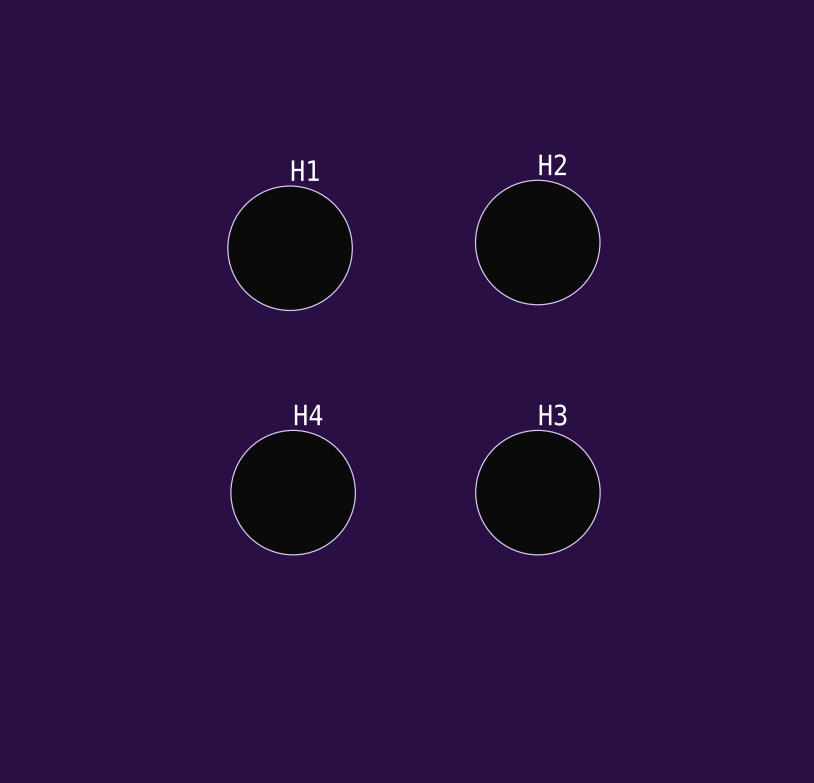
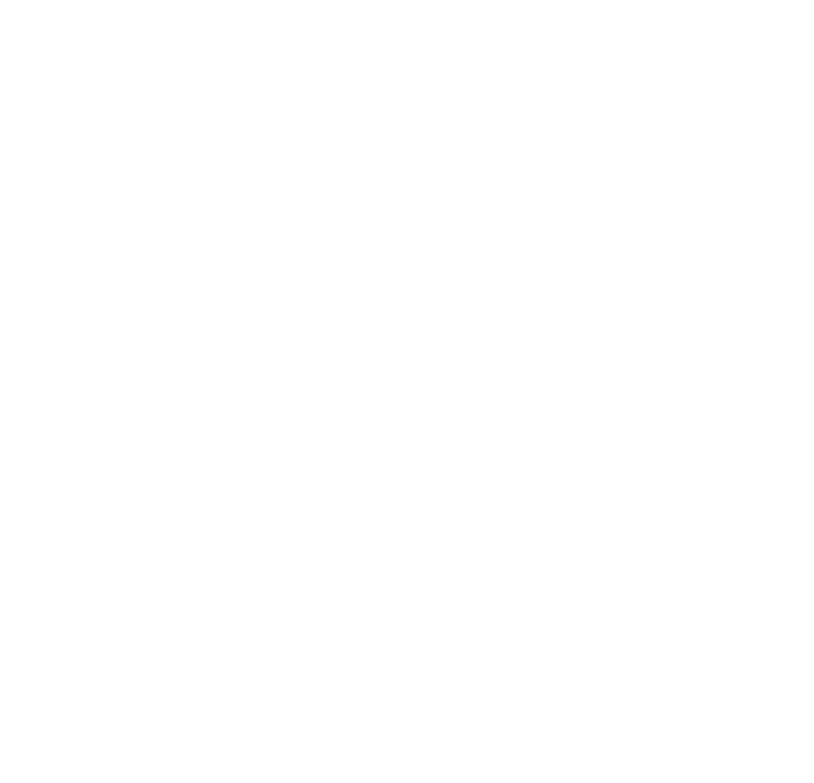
H2: (537, 242) -> none
H1: (290, 248) -> none
H4: (293, 492) -> none
H3: (537, 492) -> none

